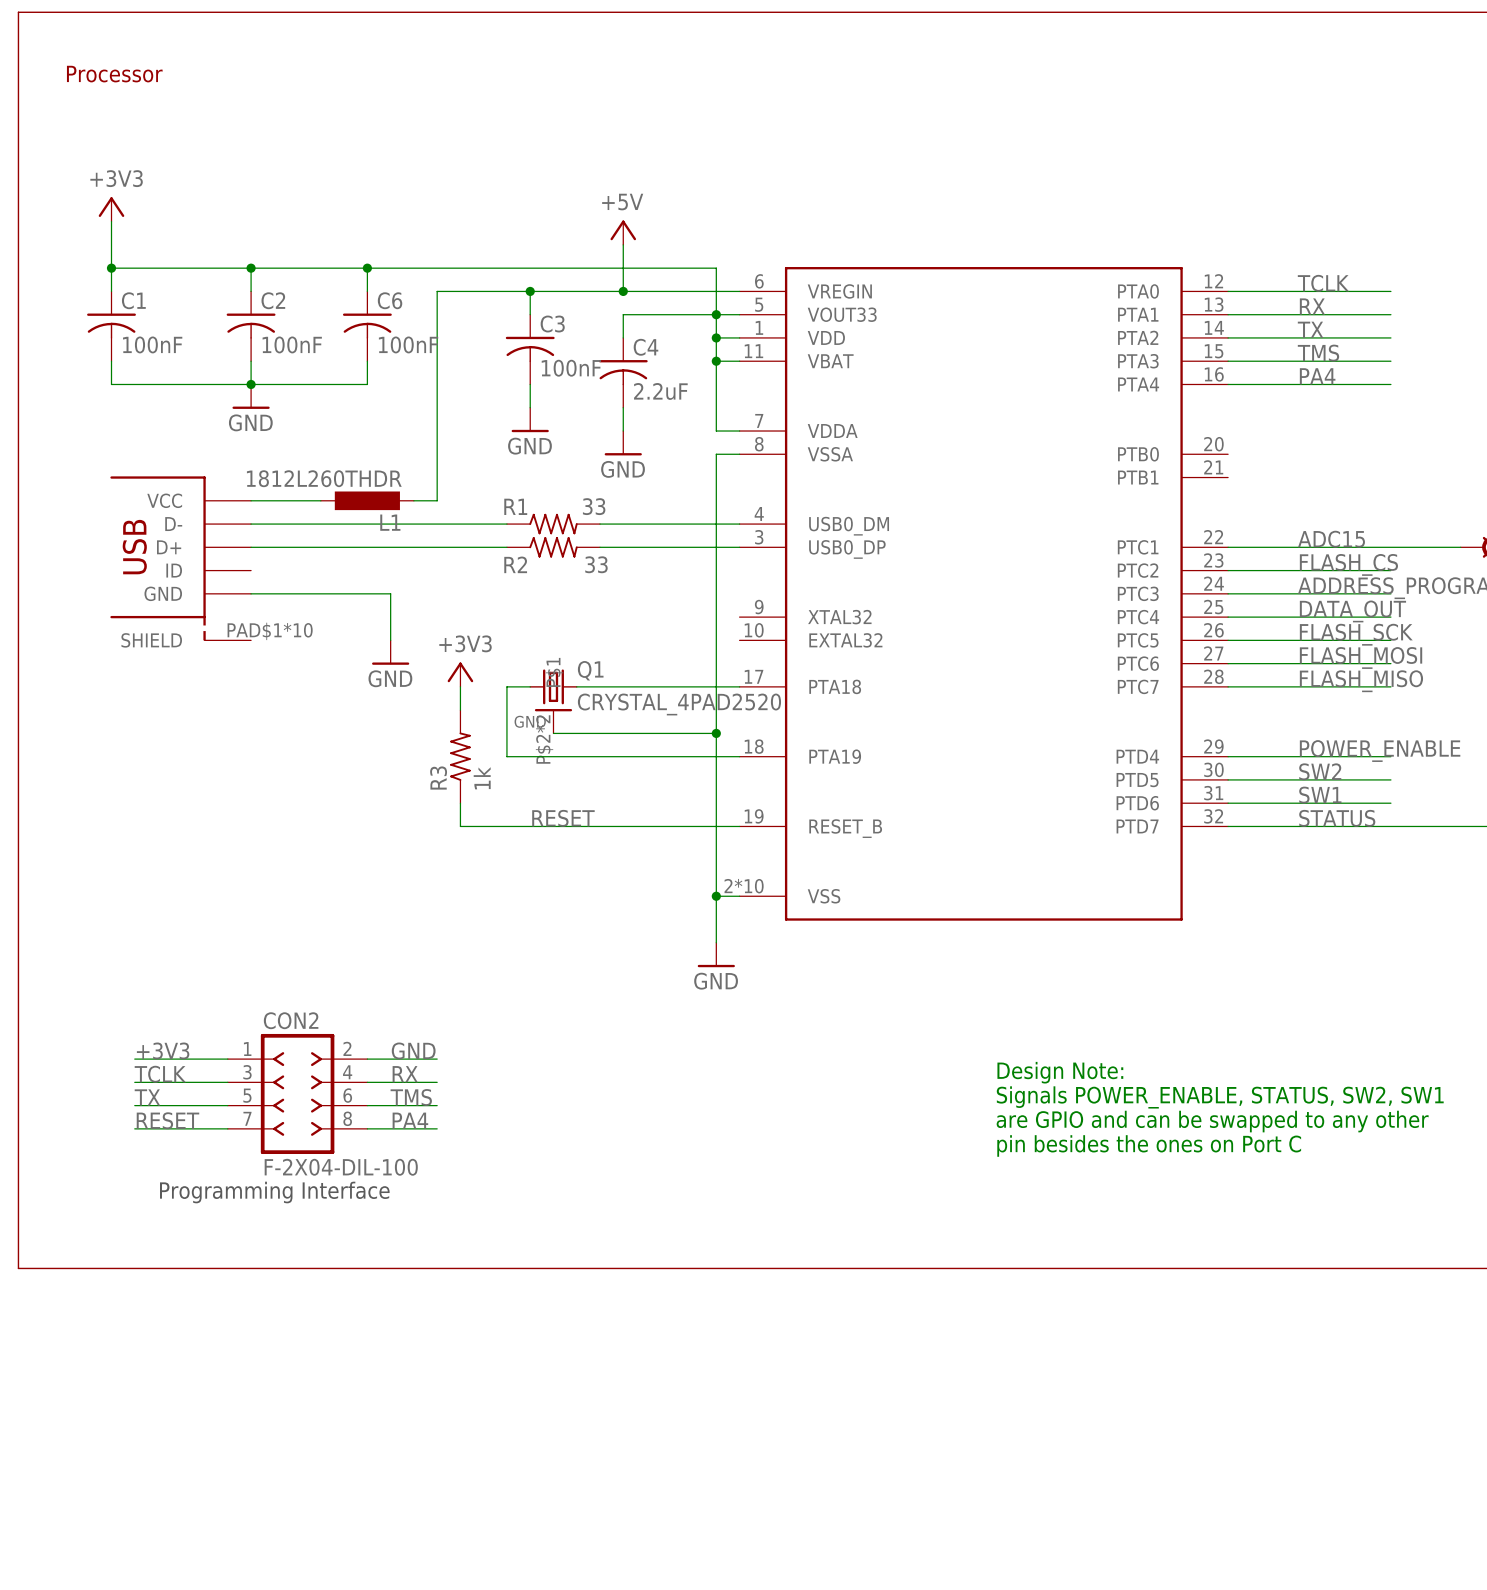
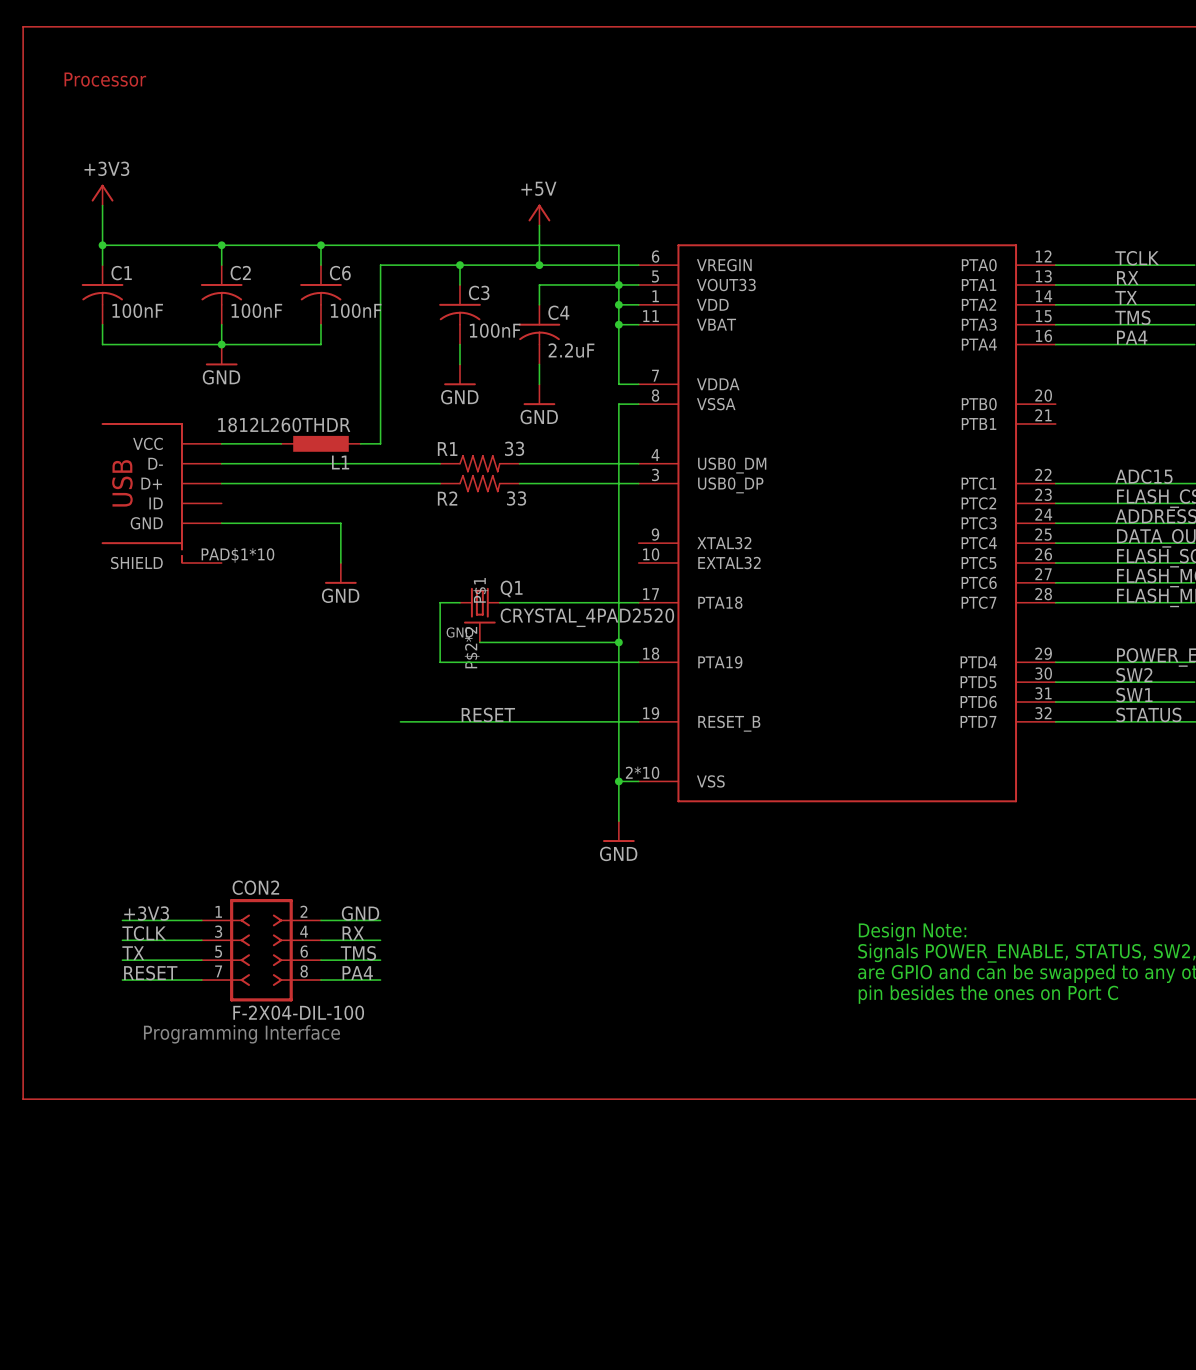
power symbol: +3V3 (460, 674) -> none
wire: (460, 686) (460, 710) -> none
R3: 1k (460, 756) -> none
wire: (460, 803) (460, 826) -> none

